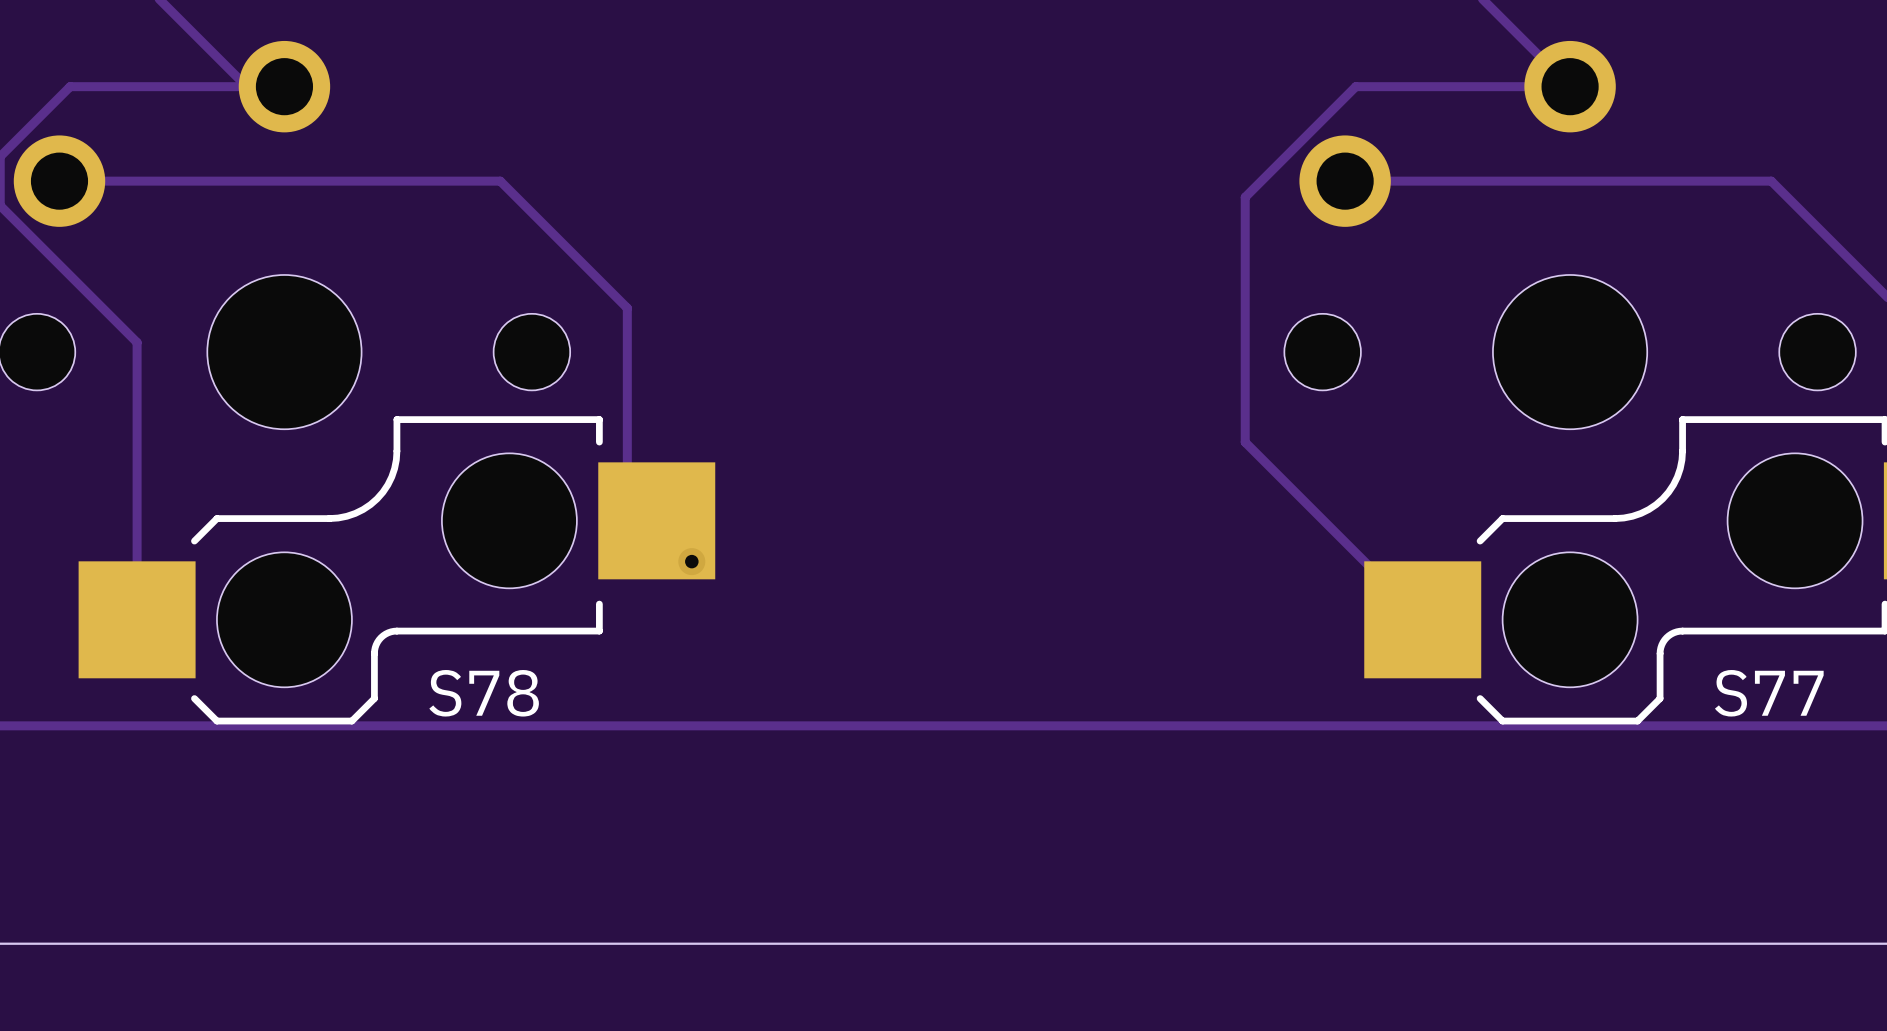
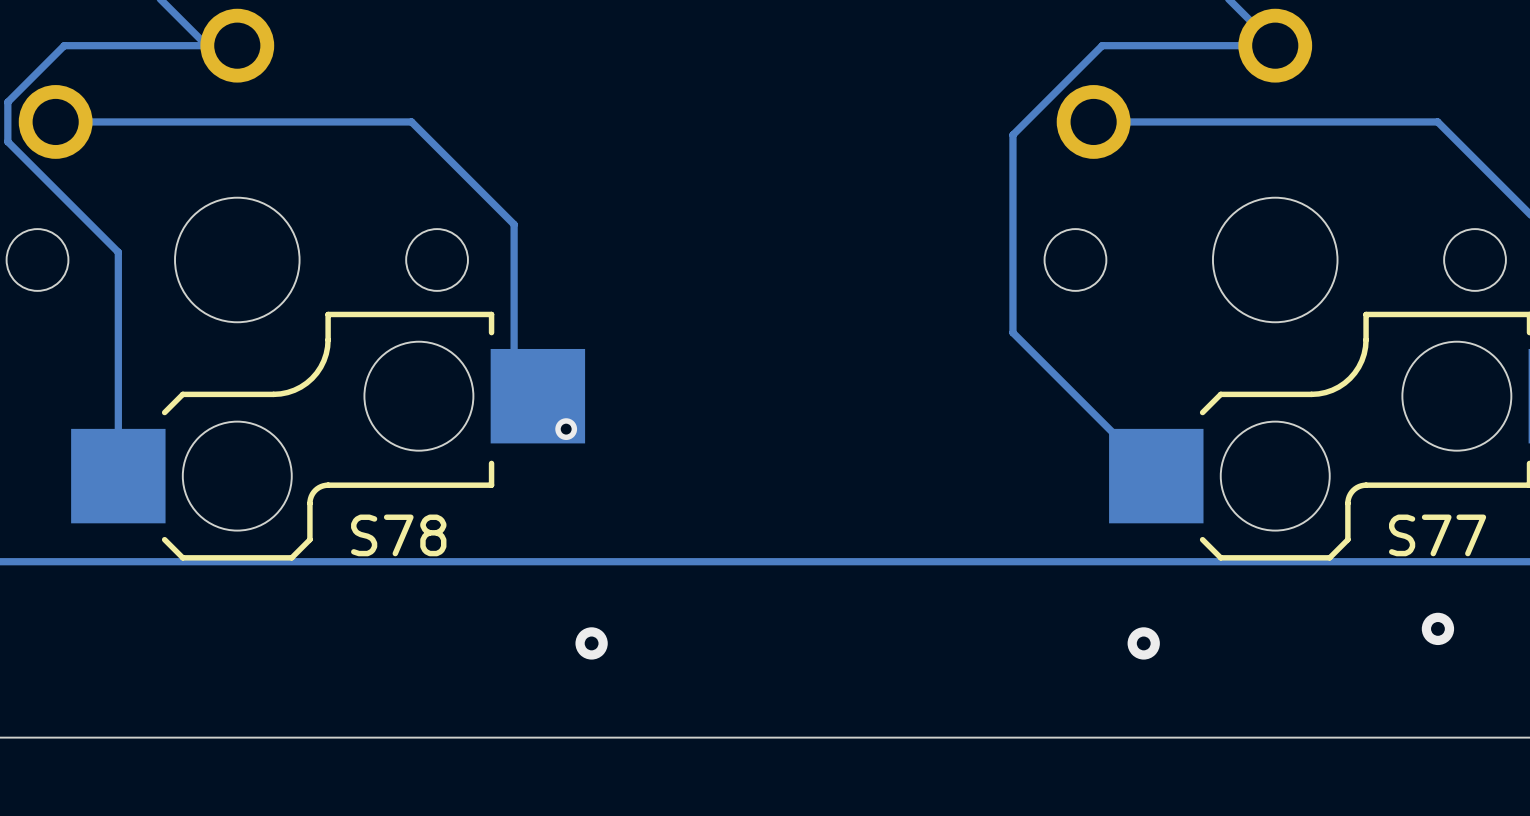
via: none -> (1437, 628)
via: none -> (591, 643)
via: none -> (1143, 643)

